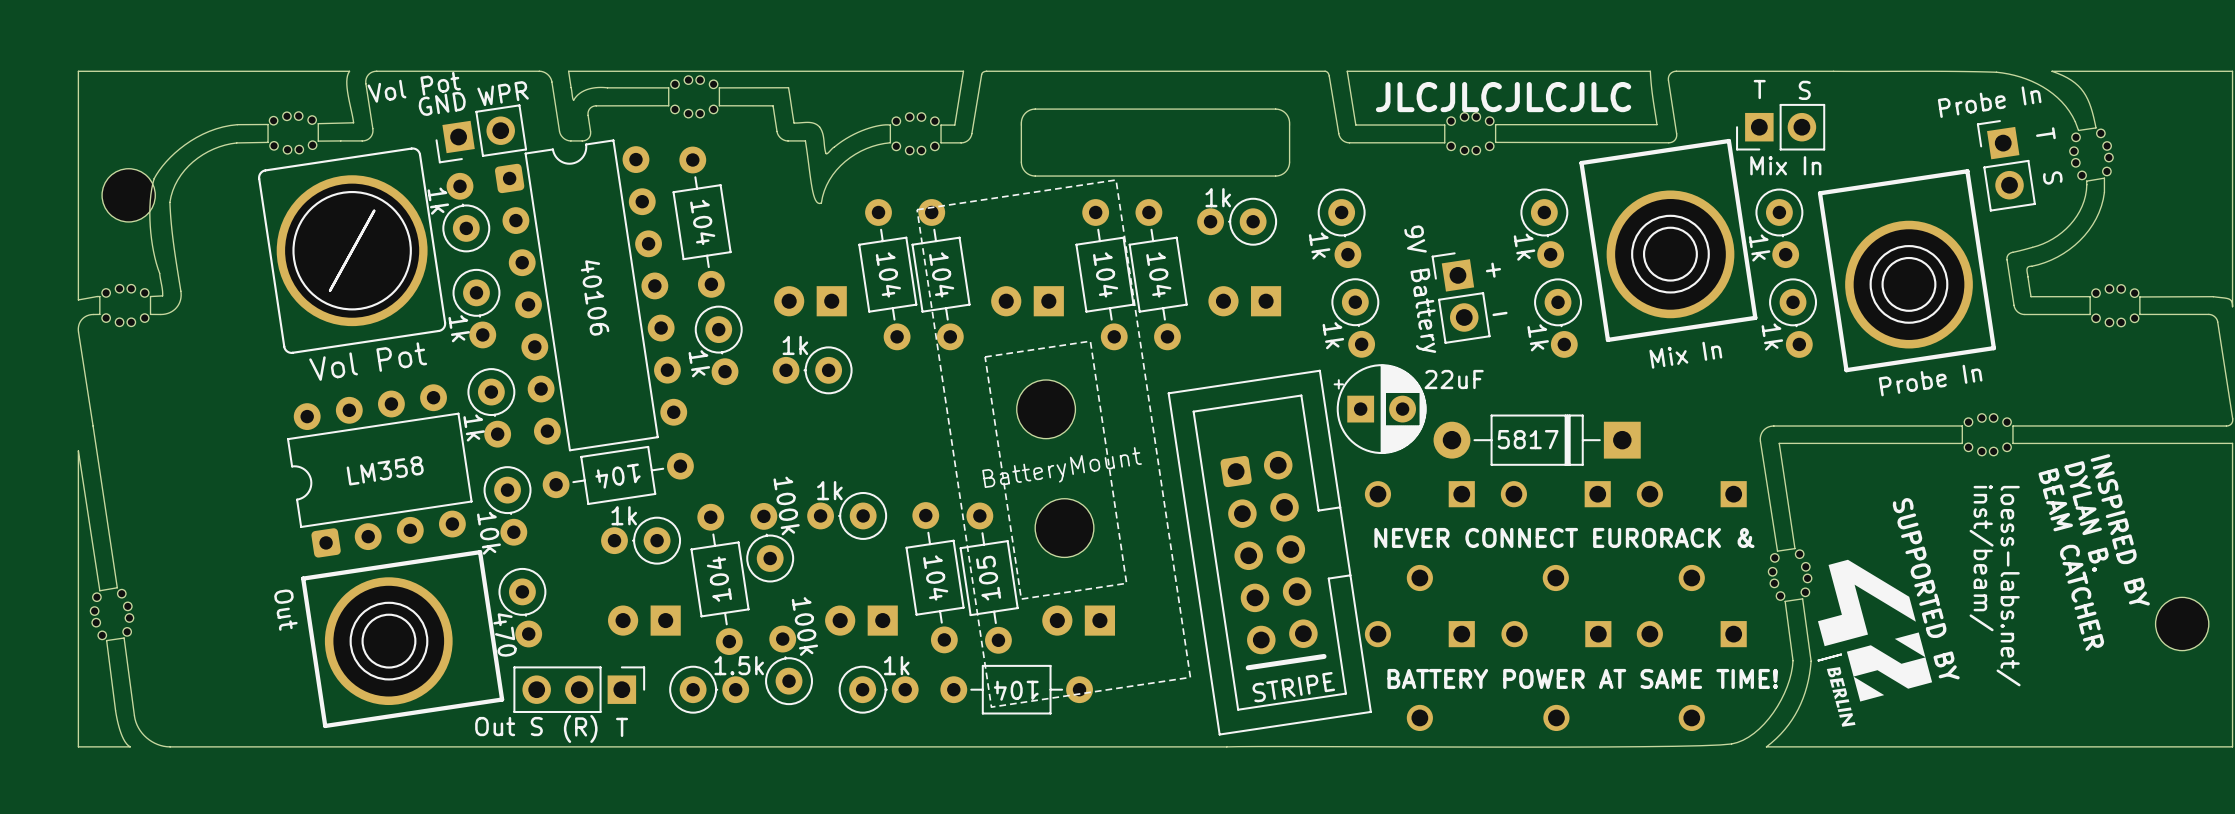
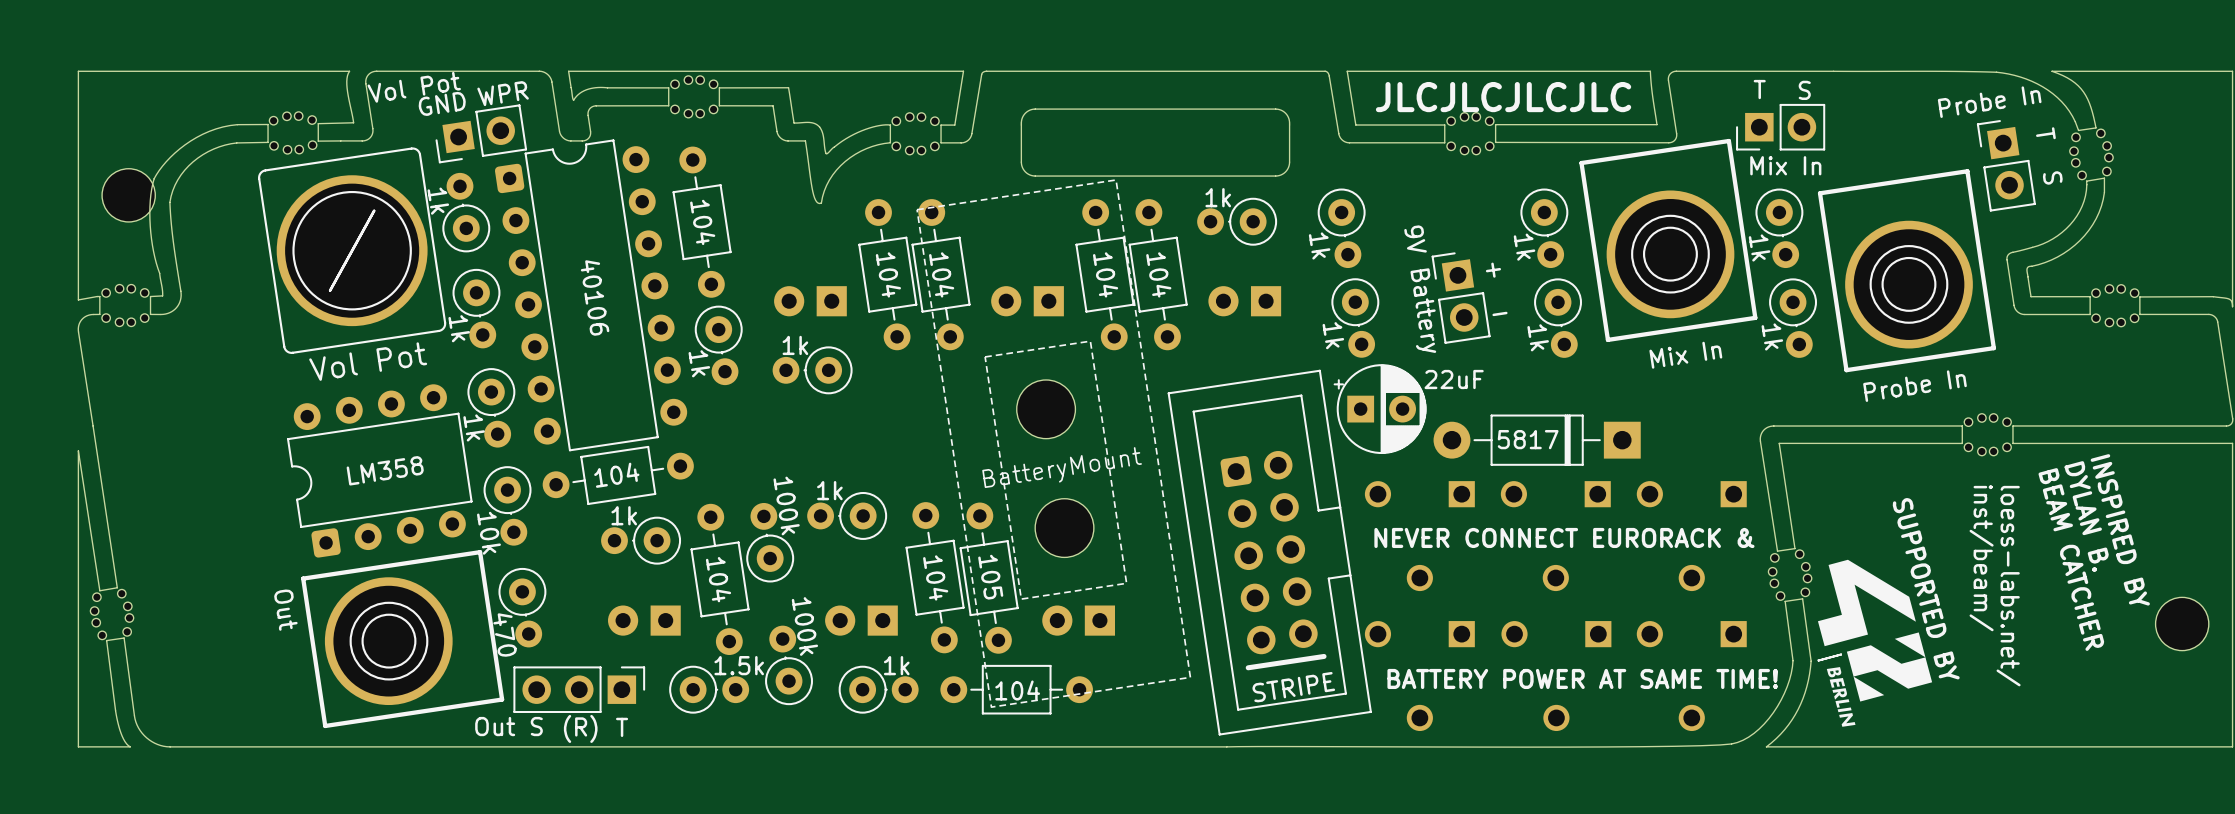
drawing shape: [1817, 169, 1996, 397] -> [1817, 169, 1996, 402]
part text rotation: 0° (618, 476) -> 180° (616, 475)
part text rotation: 0° (988, 578) -> 180° (990, 577)
part text rotation: 0° (719, 579) -> 180° (718, 579)
part text rotation: 0° (1016, 690) -> 180° (1017, 690)

